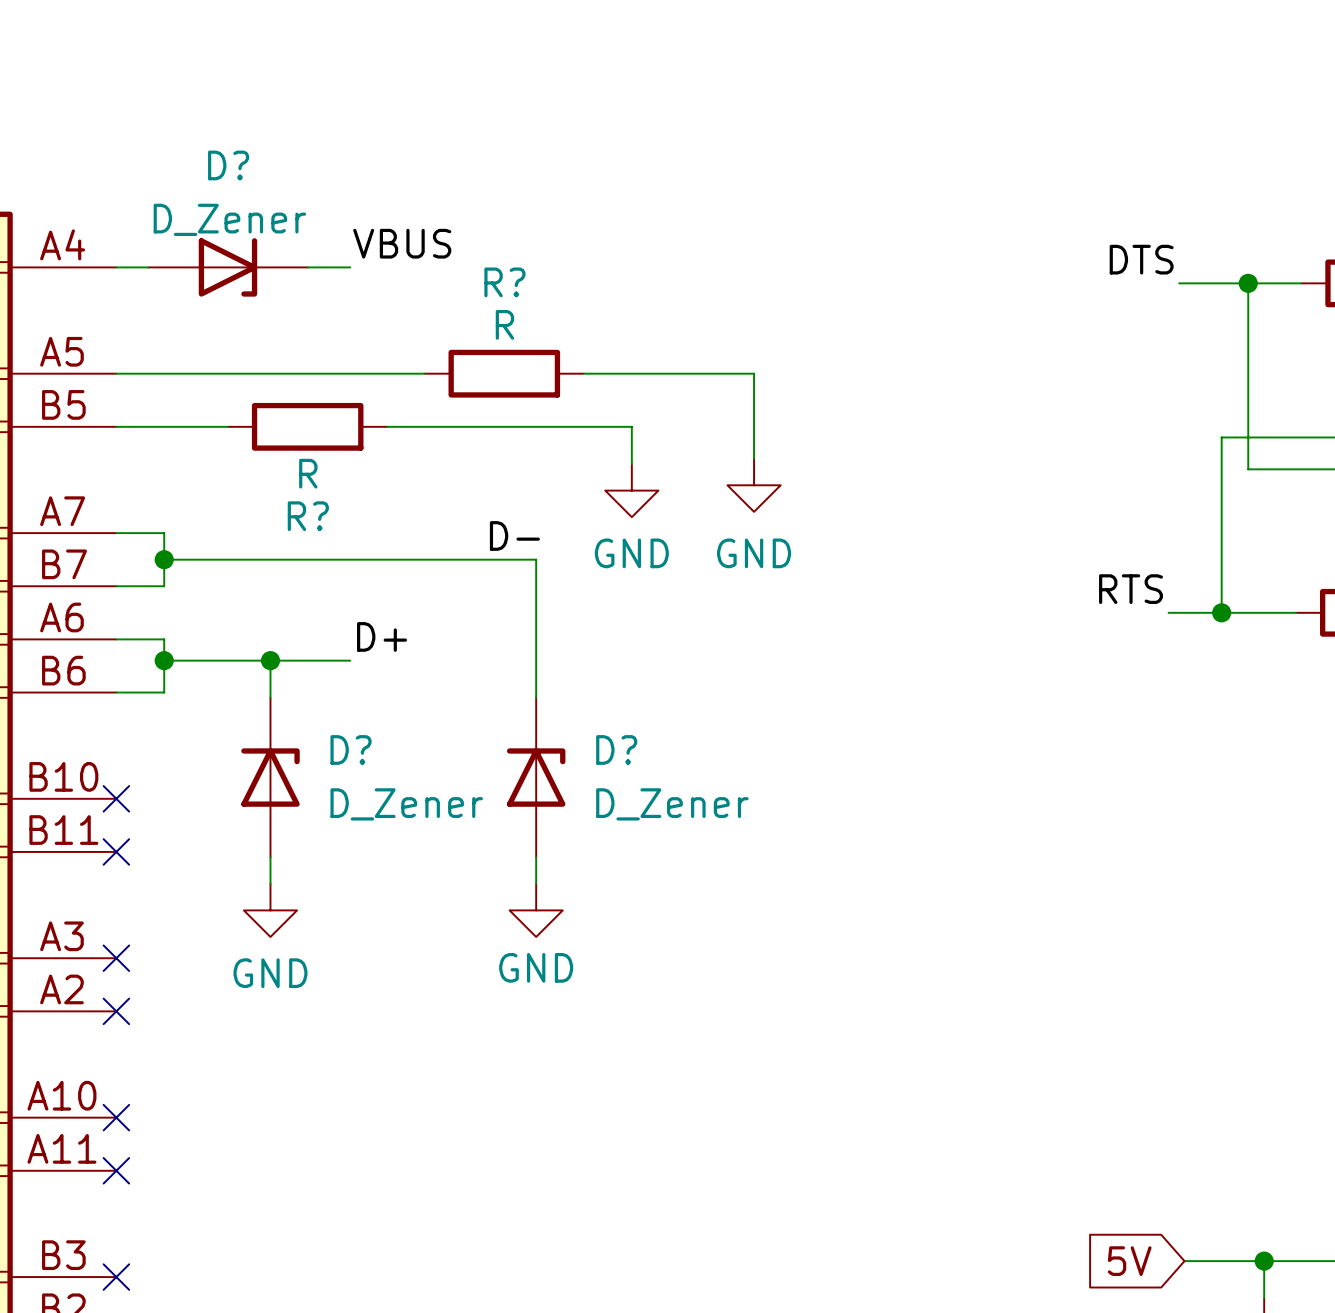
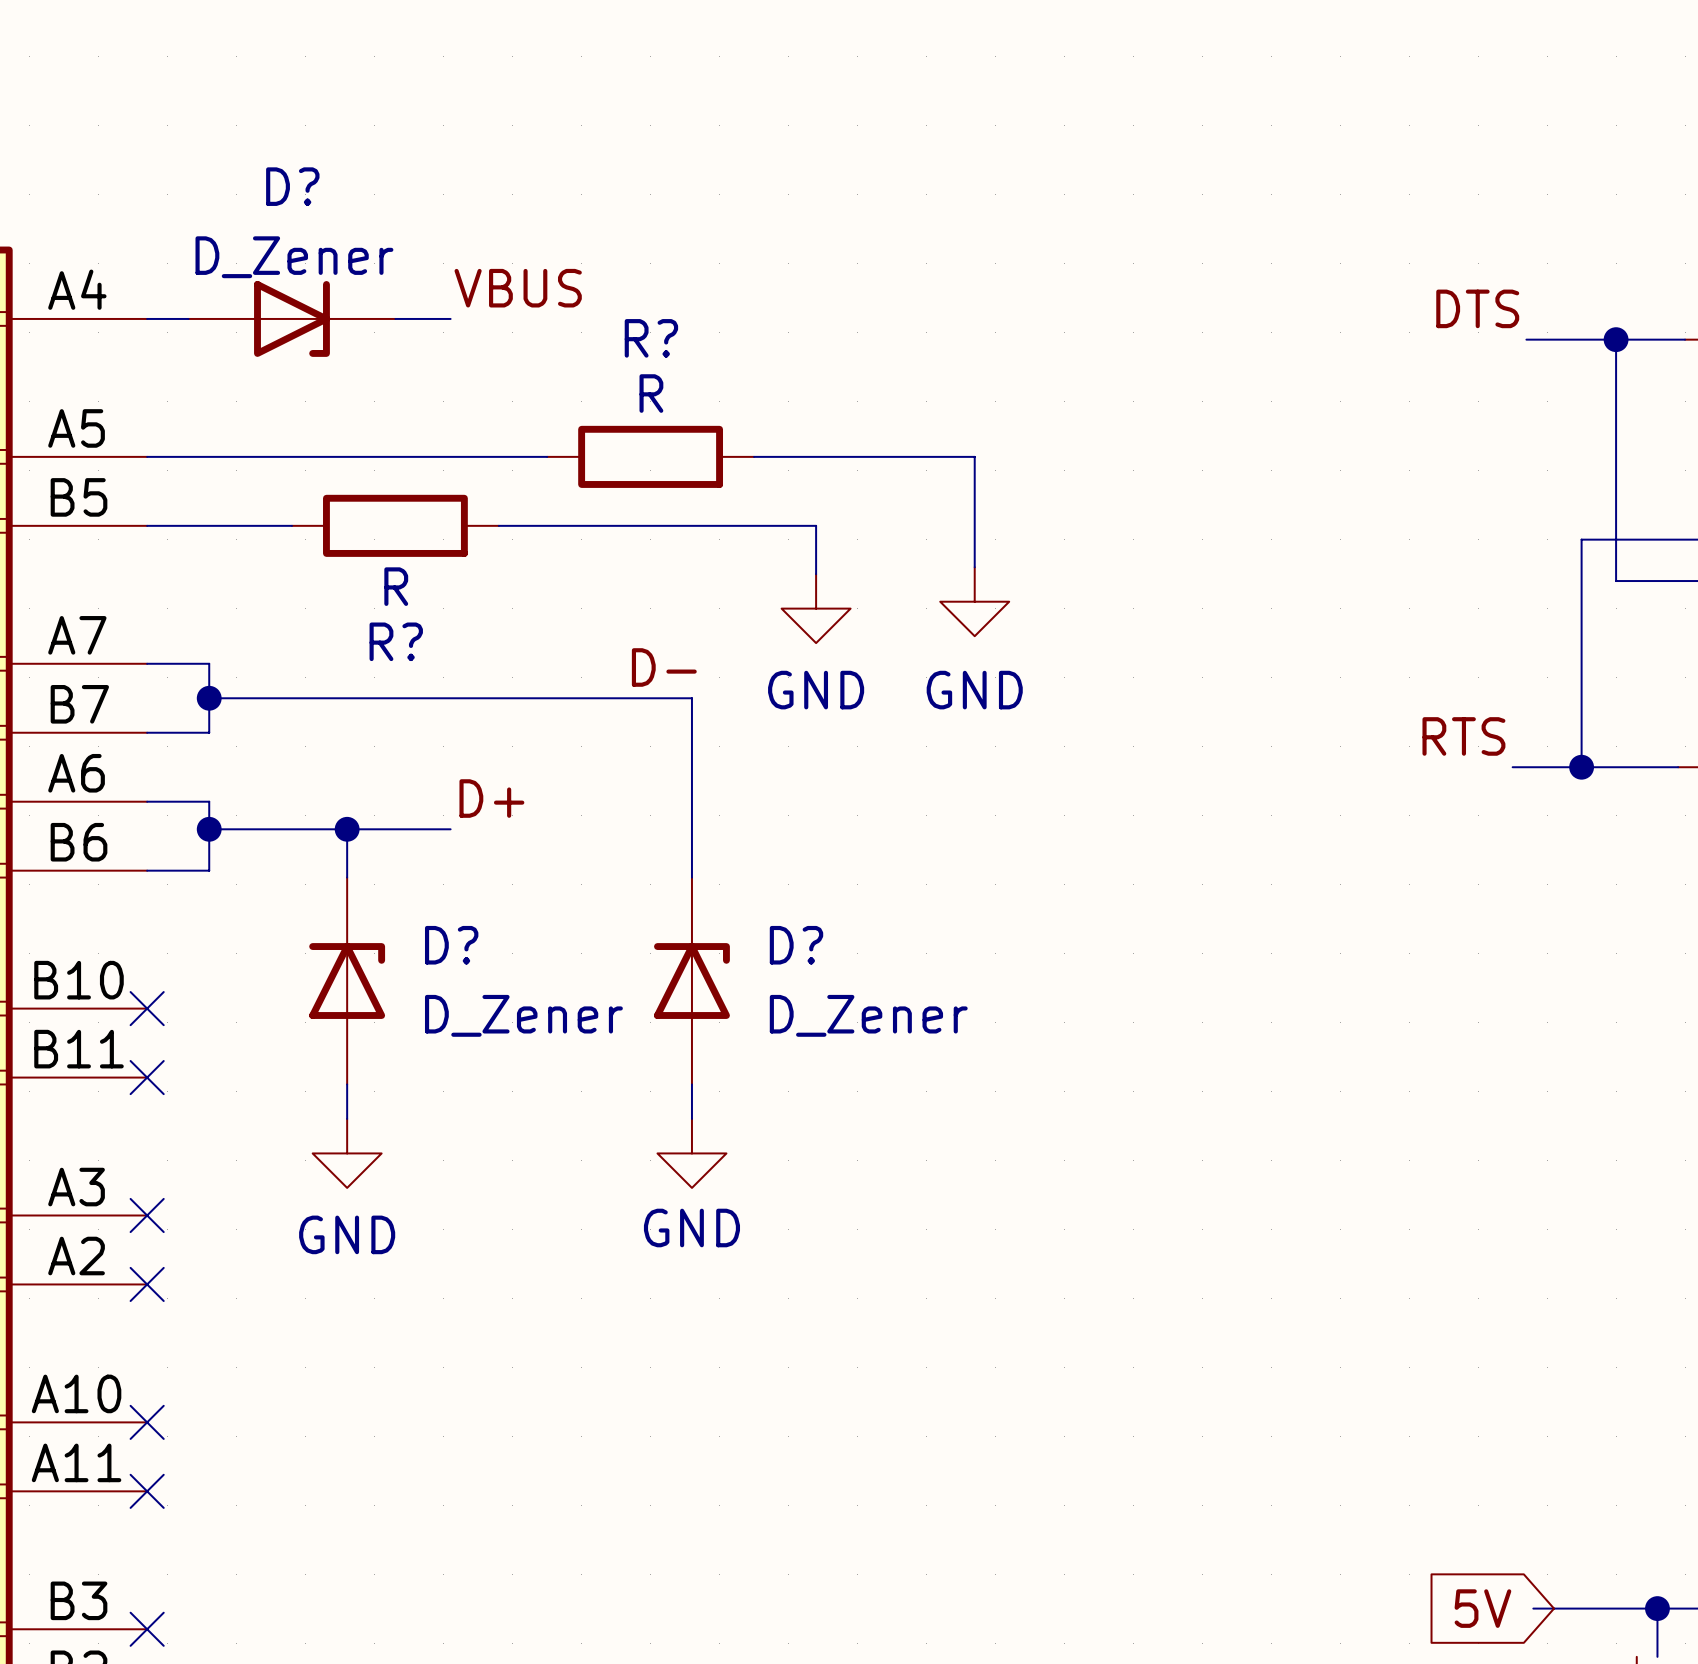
global label position: 5V (1129, 1261) -> 5V (1482, 1608)
wire: (1264, 1261) (1264, 1298) -> (1657, 1608) (1657, 1656)
junction position: (1264, 1261) -> (1657, 1608)

